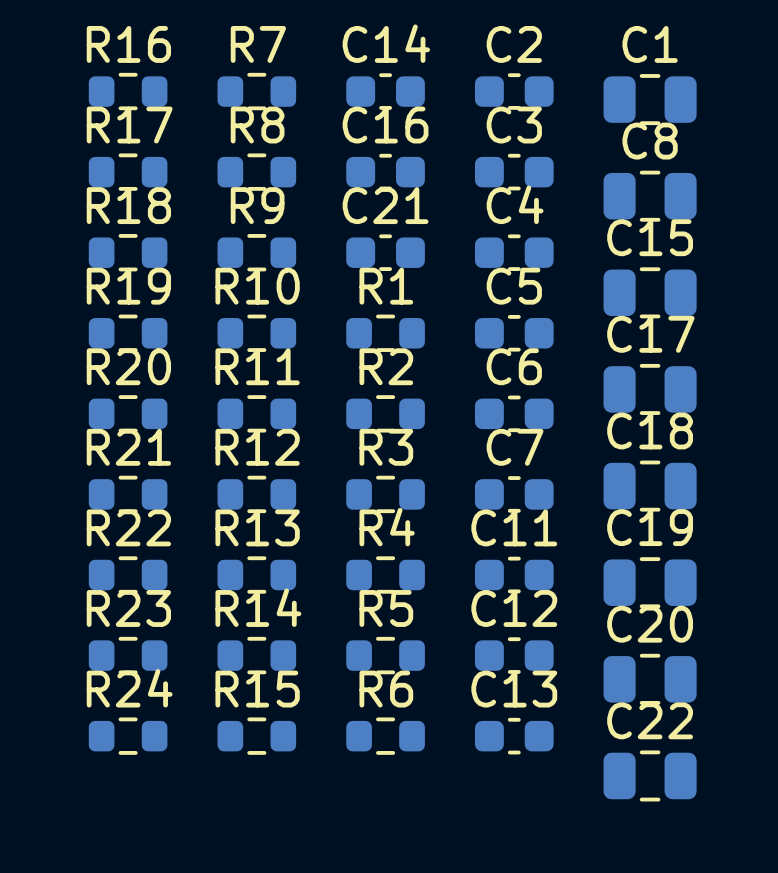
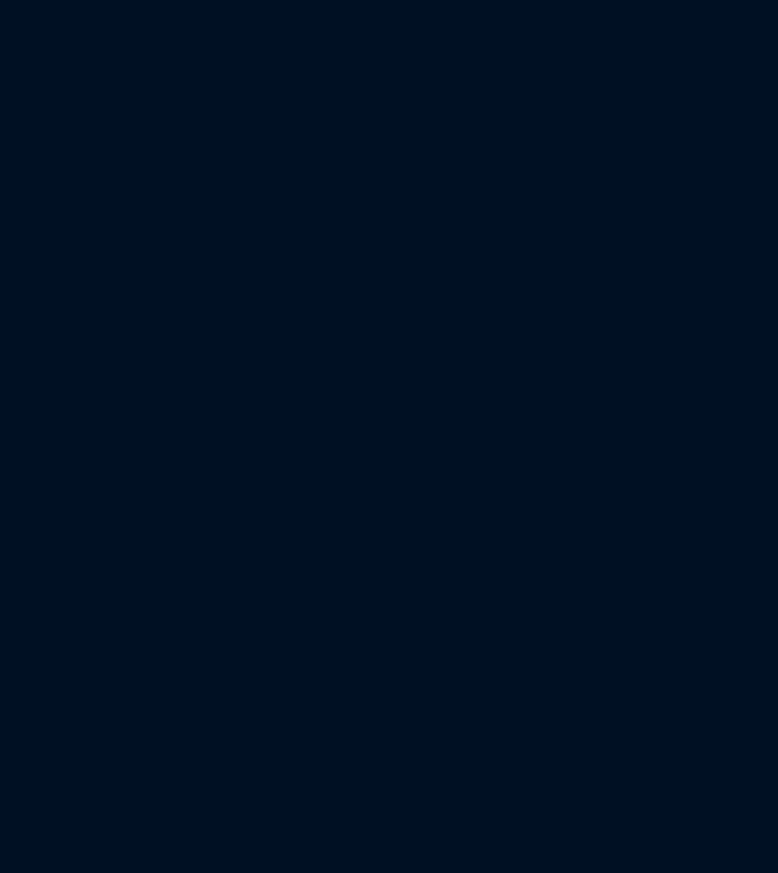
R16: (128, 91) -> none
R7: (256, 91) -> none
C14: (385, 91) -> none
C2: (514, 91) -> none
C1: (650, 99) -> none
R17: (128, 172) -> none
R8: (256, 172) -> none
C16: (385, 172) -> none
C3: (514, 172) -> none
C8: (650, 196) -> none
R18: (128, 252) -> none
R9: (256, 252) -> none
C21: (385, 252) -> none
C4: (514, 252) -> none
C15: (650, 292) -> none
R19: (128, 333) -> none
R10: (256, 333) -> none
R1: (385, 333) -> none
C5: (514, 333) -> none
C17: (650, 389) -> none
R20: (128, 413) -> none
R11: (256, 413) -> none
R2: (385, 413) -> none
C6: (514, 413) -> none
C18: (650, 486) -> none
R21: (128, 494) -> none
R12: (256, 494) -> none
R3: (385, 494) -> none
C7: (514, 494) -> none
R22: (128, 575) -> none
R13: (256, 575) -> none
R4: (385, 575) -> none
C11: (514, 575) -> none
C19: (650, 582) -> none
R23: (128, 655) -> none
R14: (256, 655) -> none
R5: (385, 655) -> none
C12: (514, 655) -> none
C20: (650, 679) -> none
R24: (128, 736) -> none
R15: (256, 736) -> none
R6: (385, 736) -> none
C13: (514, 736) -> none
C22: (650, 775) -> none

